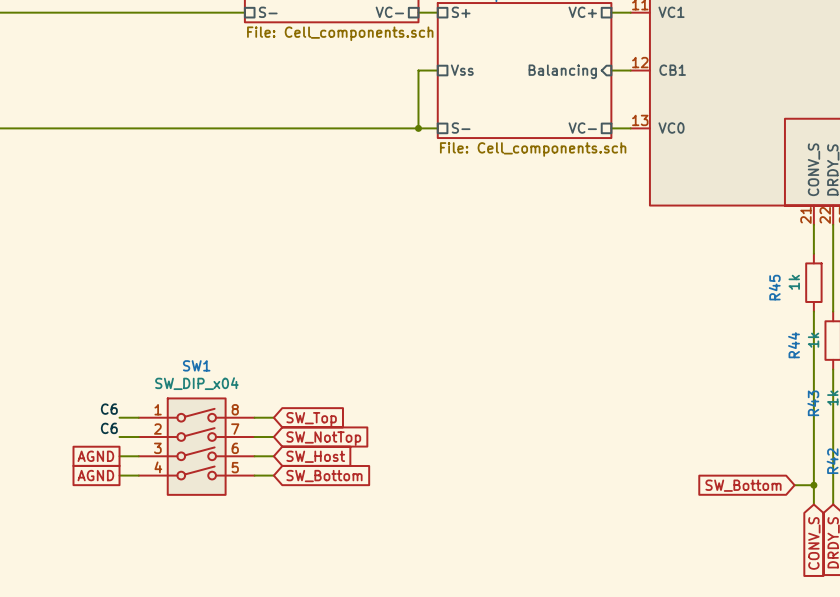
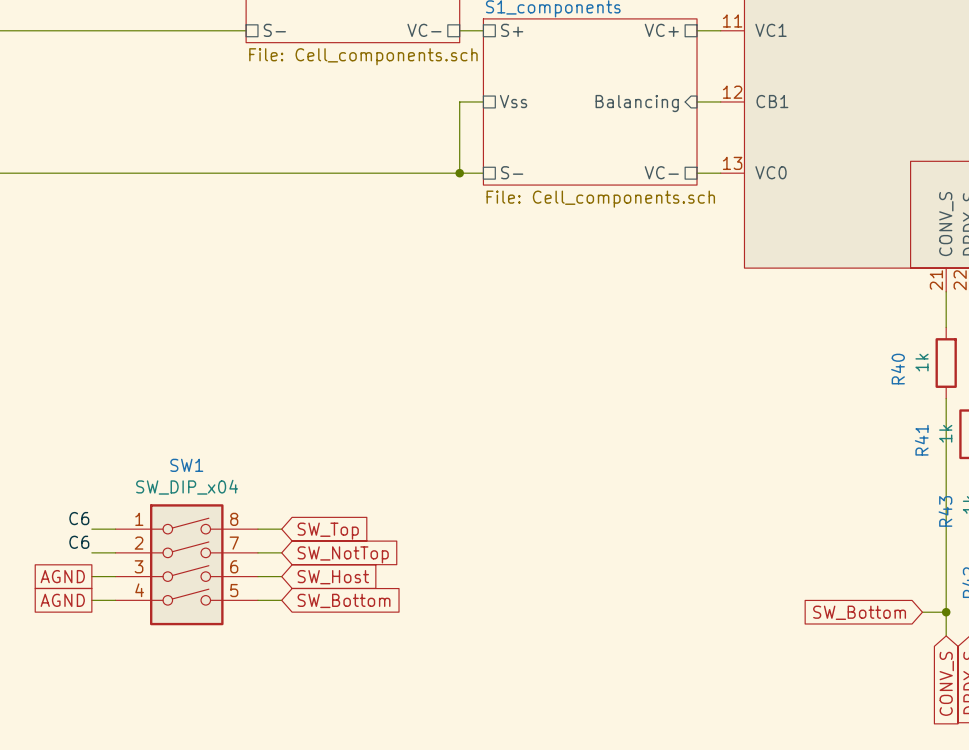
R45 name: R45 (774, 287) -> R40 (898, 369)
R44 name: R44 (794, 345) -> R41 (921, 440)

